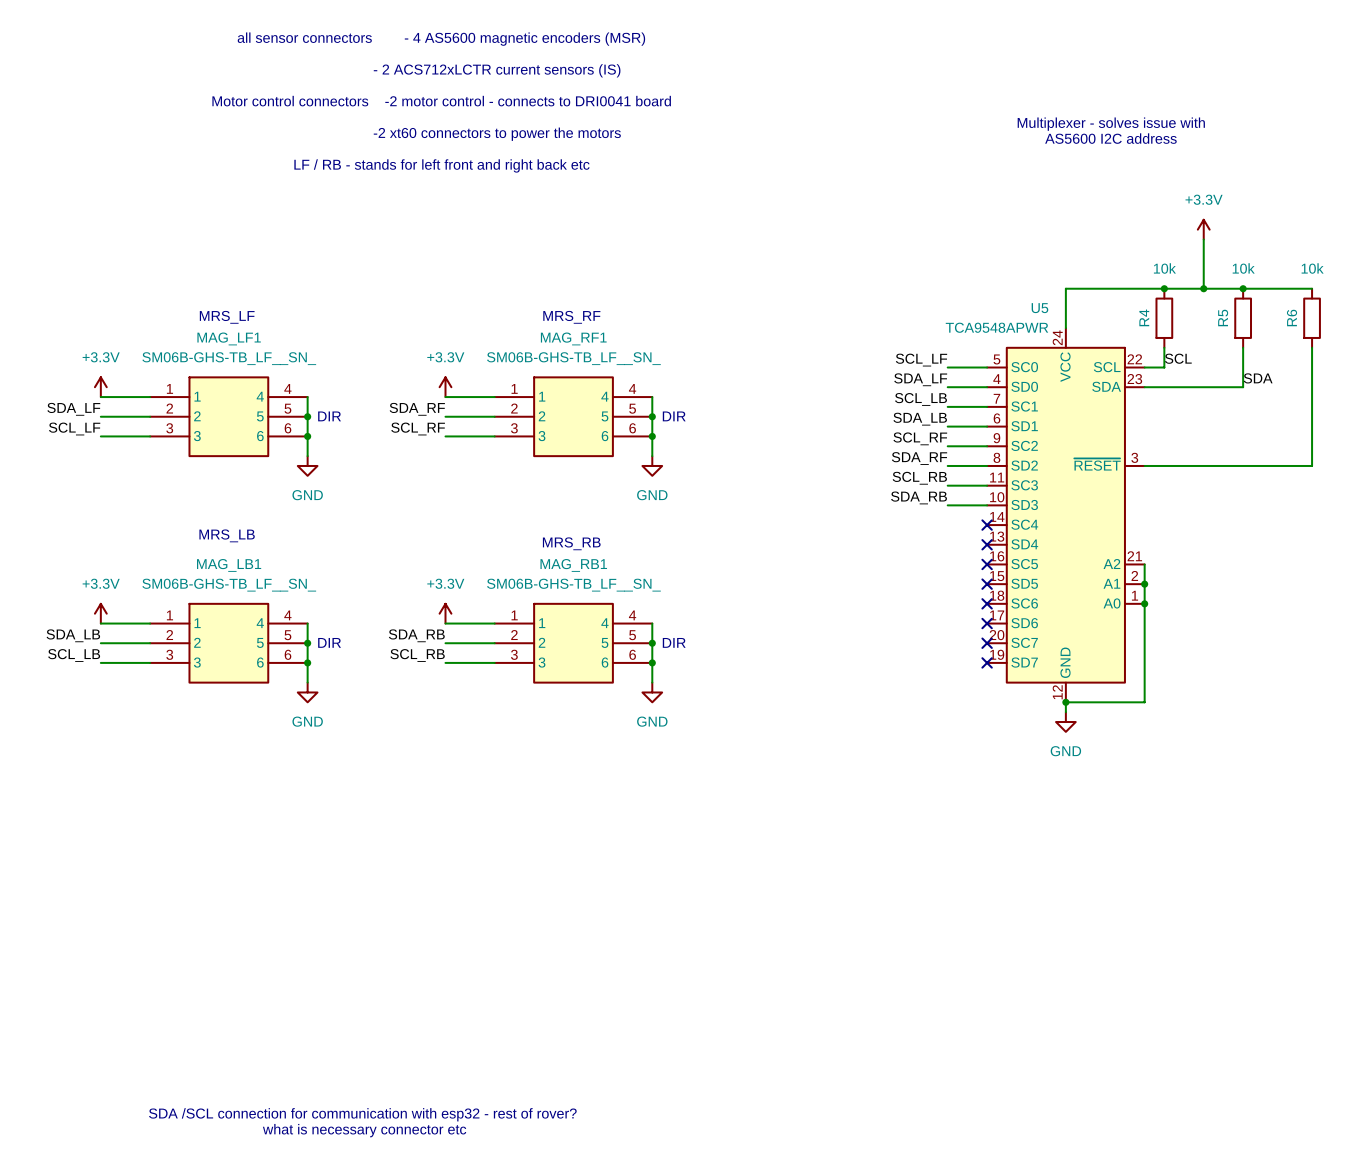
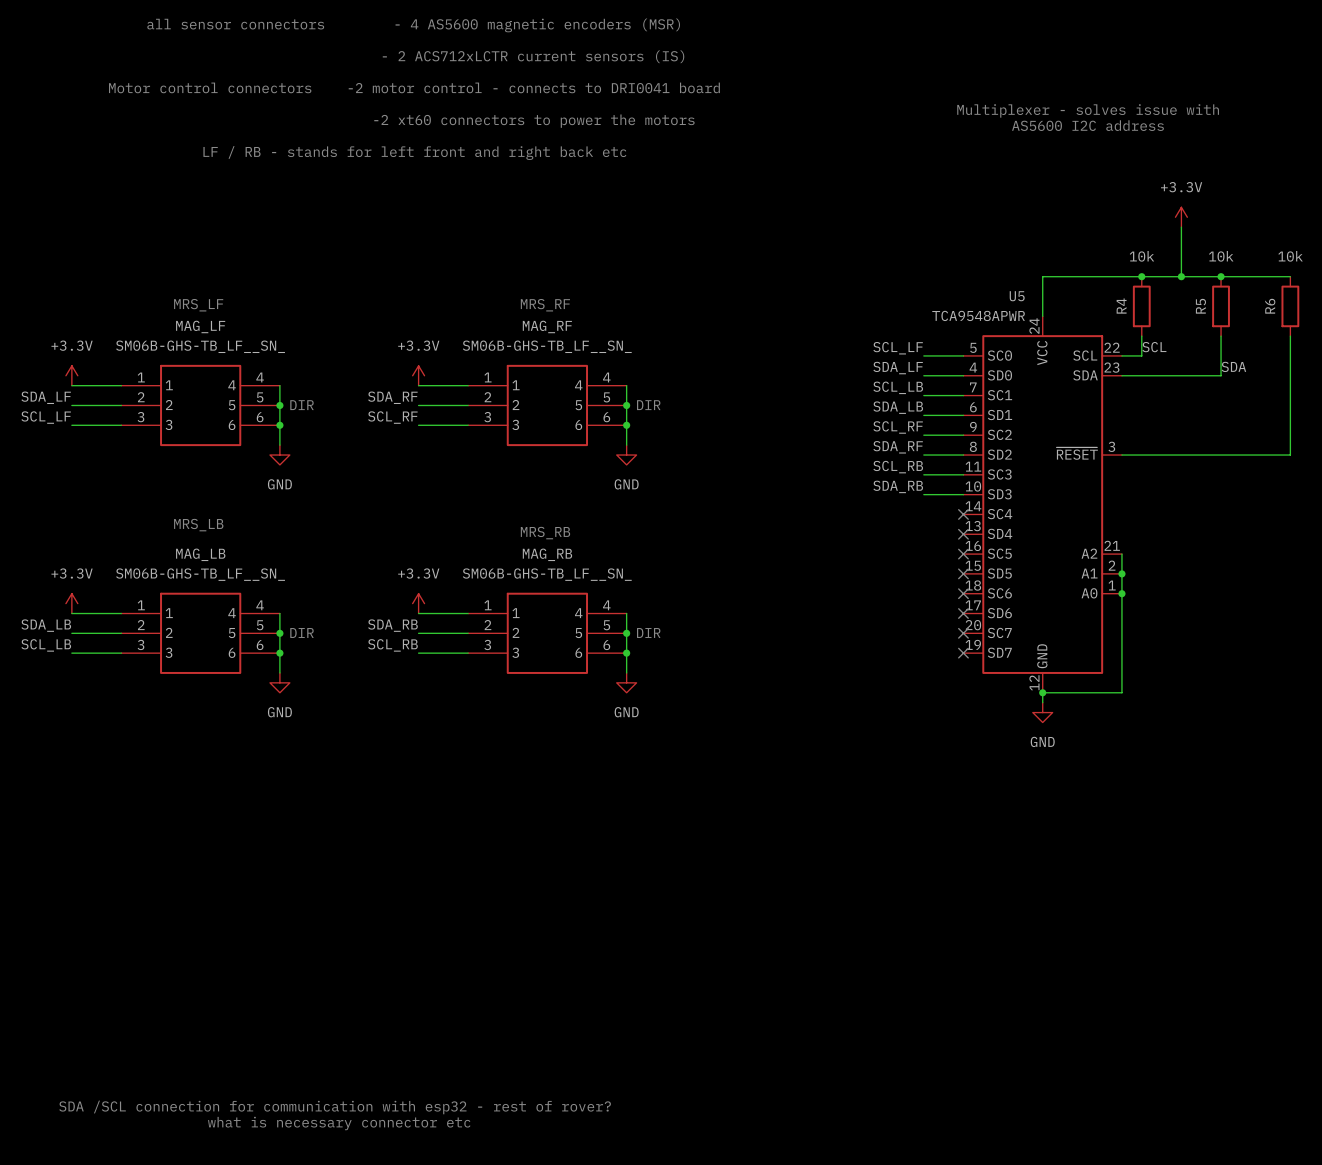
MAG_LF1 name: MAG_LF1 (229, 338) -> MAG_LF (200, 326)
MAG_RF1 name: MAG_RF1 (573, 338) -> MAG_RF (547, 326)
MAG_LB1 name: MAG_LB1 (229, 565) -> MAG_LB (200, 554)
MAG_RB1 name: MAG_RB1 (573, 565) -> MAG_RB (547, 554)

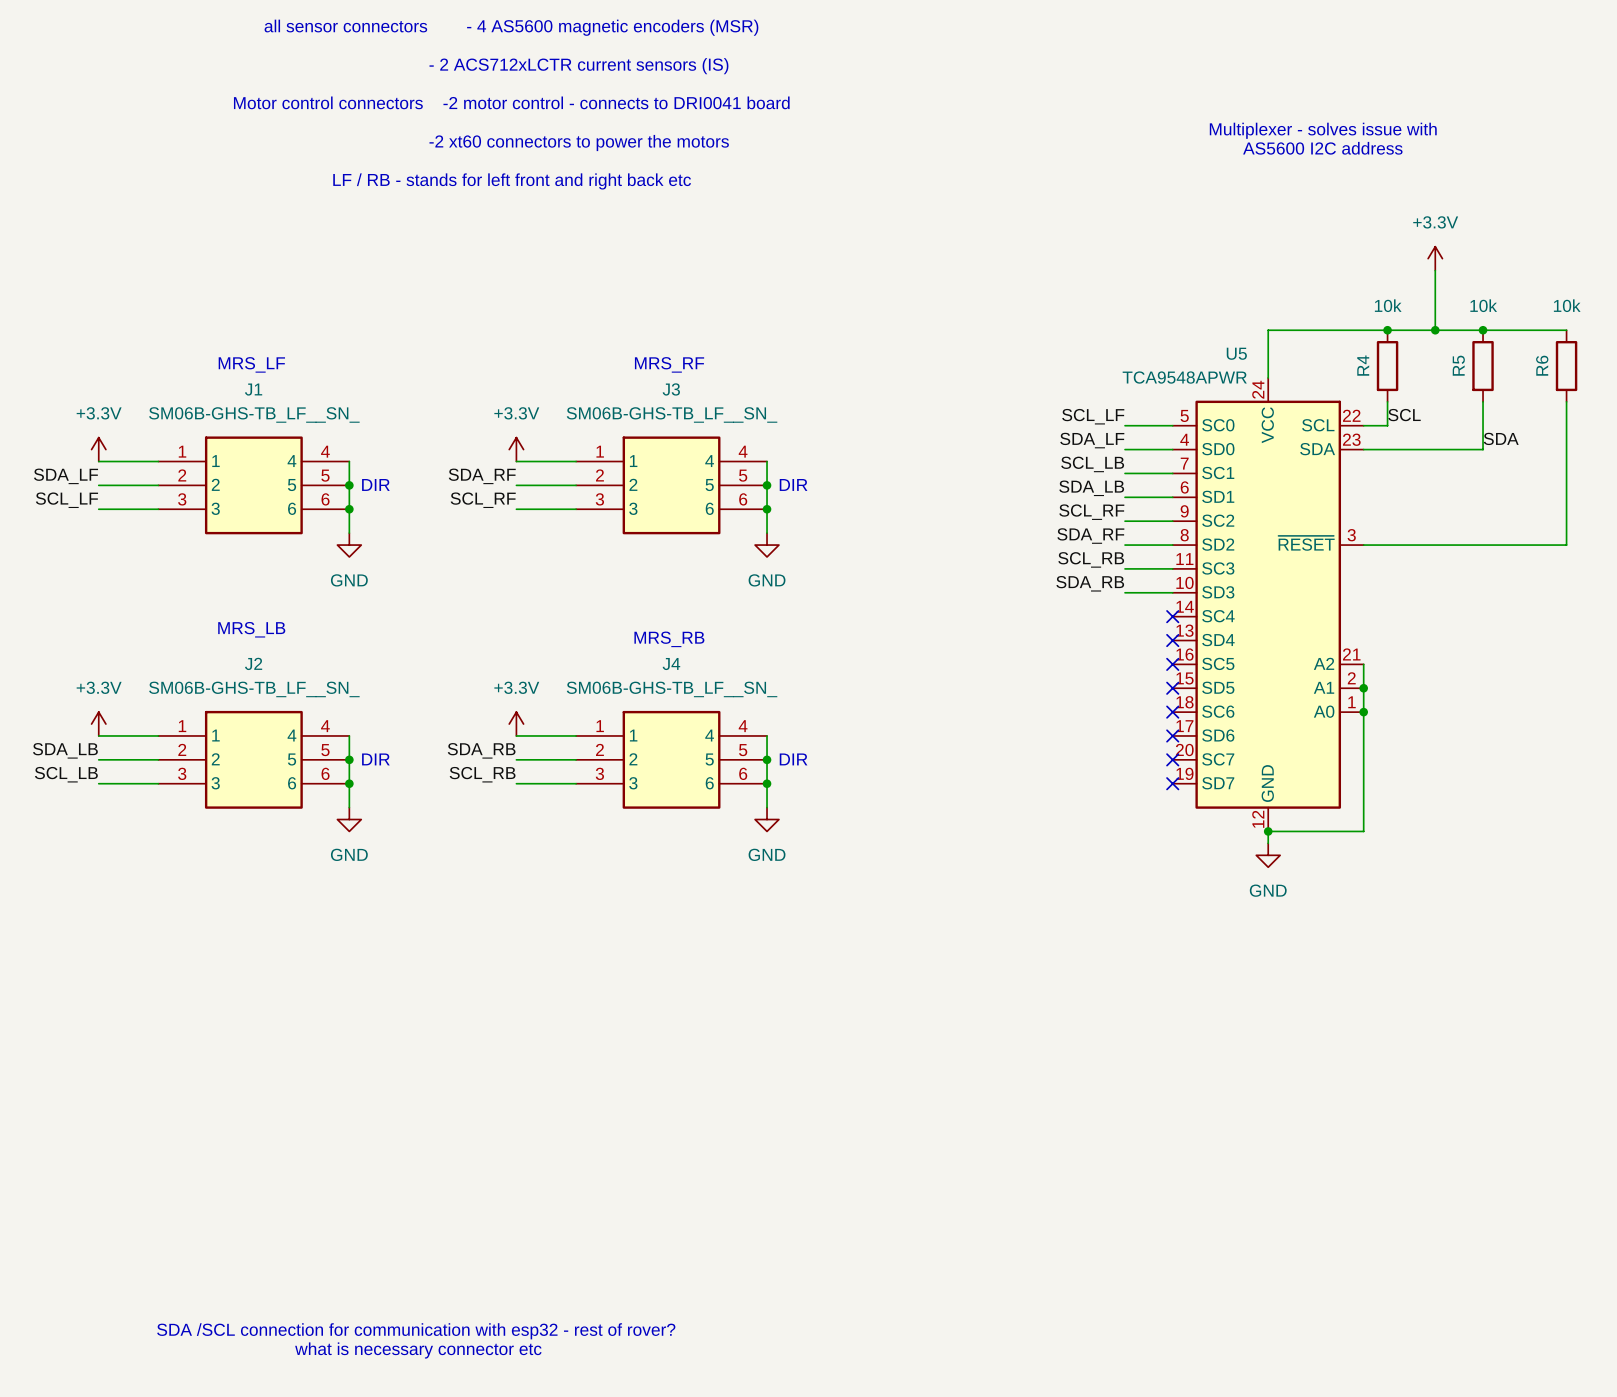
MAG_LF name: MAG_LF (200, 326) -> J1 (253, 389)
MAG_RF name: MAG_RF (547, 326) -> J3 (671, 389)
MAG_LB name: MAG_LB (200, 554) -> J2 (253, 663)
MAG_RB name: MAG_RB (547, 554) -> J4 (671, 664)

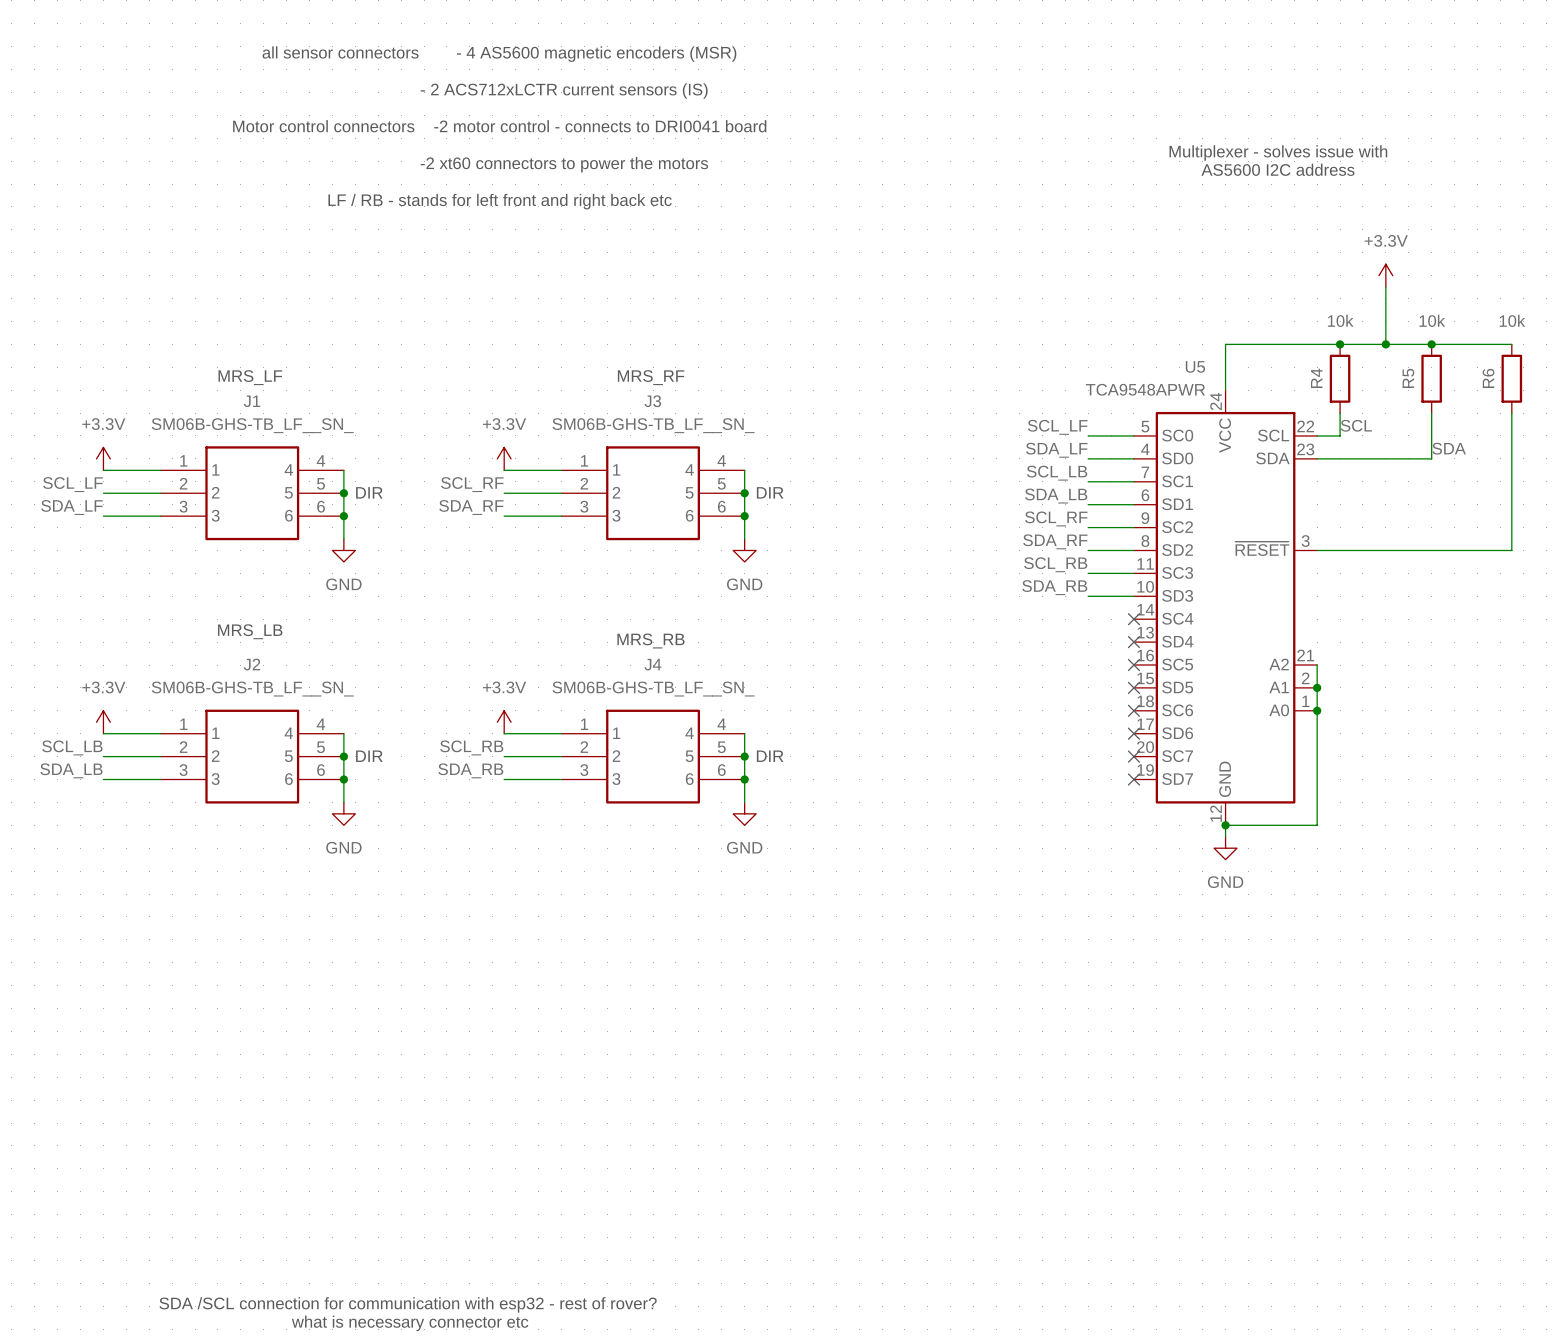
label: SDA_LF (66, 476) -> SCL_LF (72, 484)
label: SDA_RF (482, 476) -> SCL_RF (472, 484)
label: SCL_LF (66, 500) -> SDA_LF (72, 507)
label: SCL_RF (483, 500) -> SDA_RF (471, 507)
label: SDA_LB (65, 750) -> SCL_LB (72, 747)
label: SDA_RB (481, 750) -> SCL_RB (471, 747)
label: SCL_LB (66, 774) -> SDA_LB (71, 770)
label: SCL_RB (482, 774) -> SDA_RB (470, 770)

